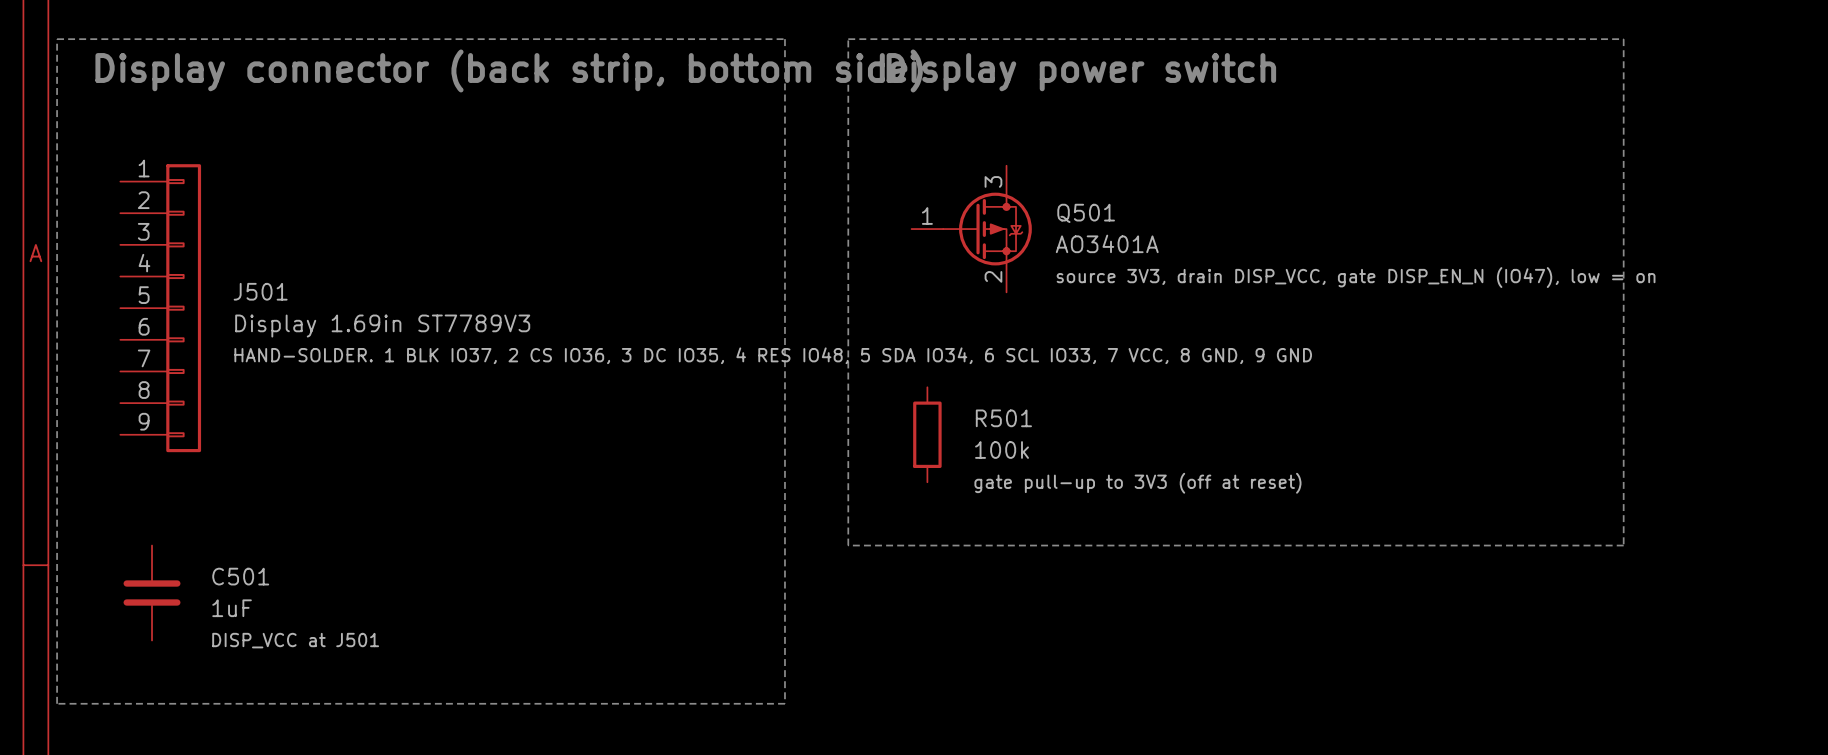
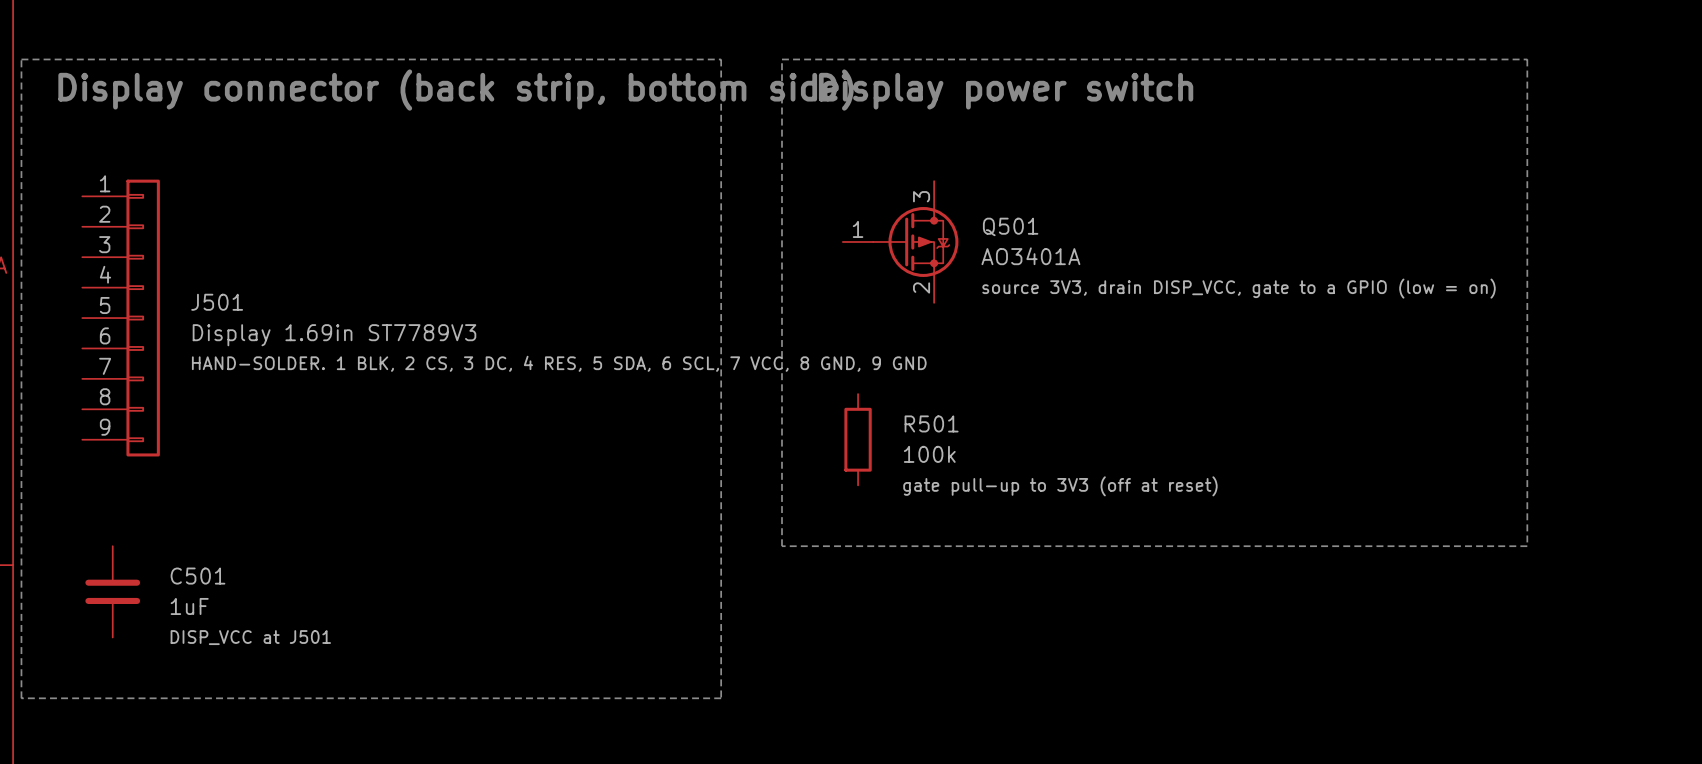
Q501 text: source 3V3, drain DISP_VCC, gate DISP_EN_N (IO47), low = on (1356, 277) -> source 3V3, drain DISP_VCC, gate to a GPIO (low = on) (1239, 288)
J501 text: HAND-SOLDER. 1 BLK IO37, 2 CS IO36, 3 DC IO35, 4 RES IO48, 5 SDA IO34, 6 SCL IO33, 7 VCC, 8 GND, 9 GND (773, 355) -> HAND-SOLDER. 1 BLK, 2 CS, 3 DC, 4 RES, 5 SDA, 6 SCL, 7 VCC, 8 GND, 9 GND (559, 363)

